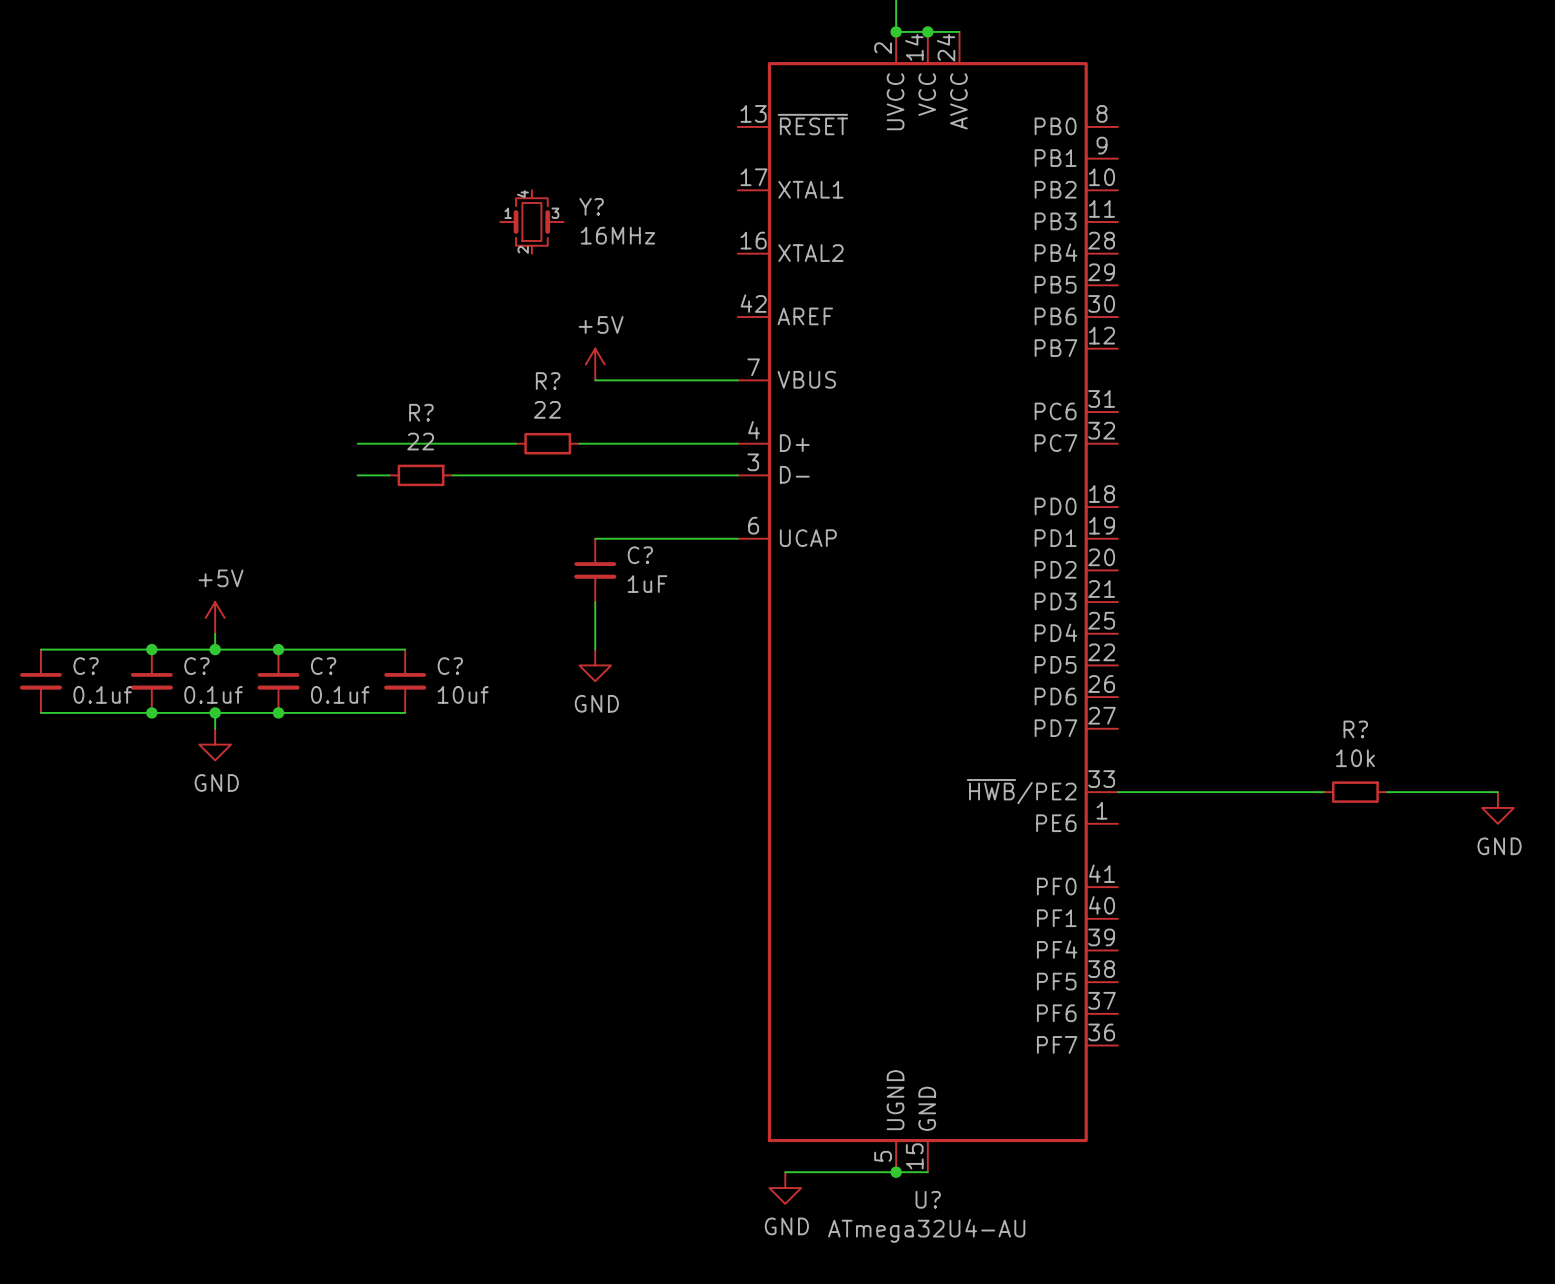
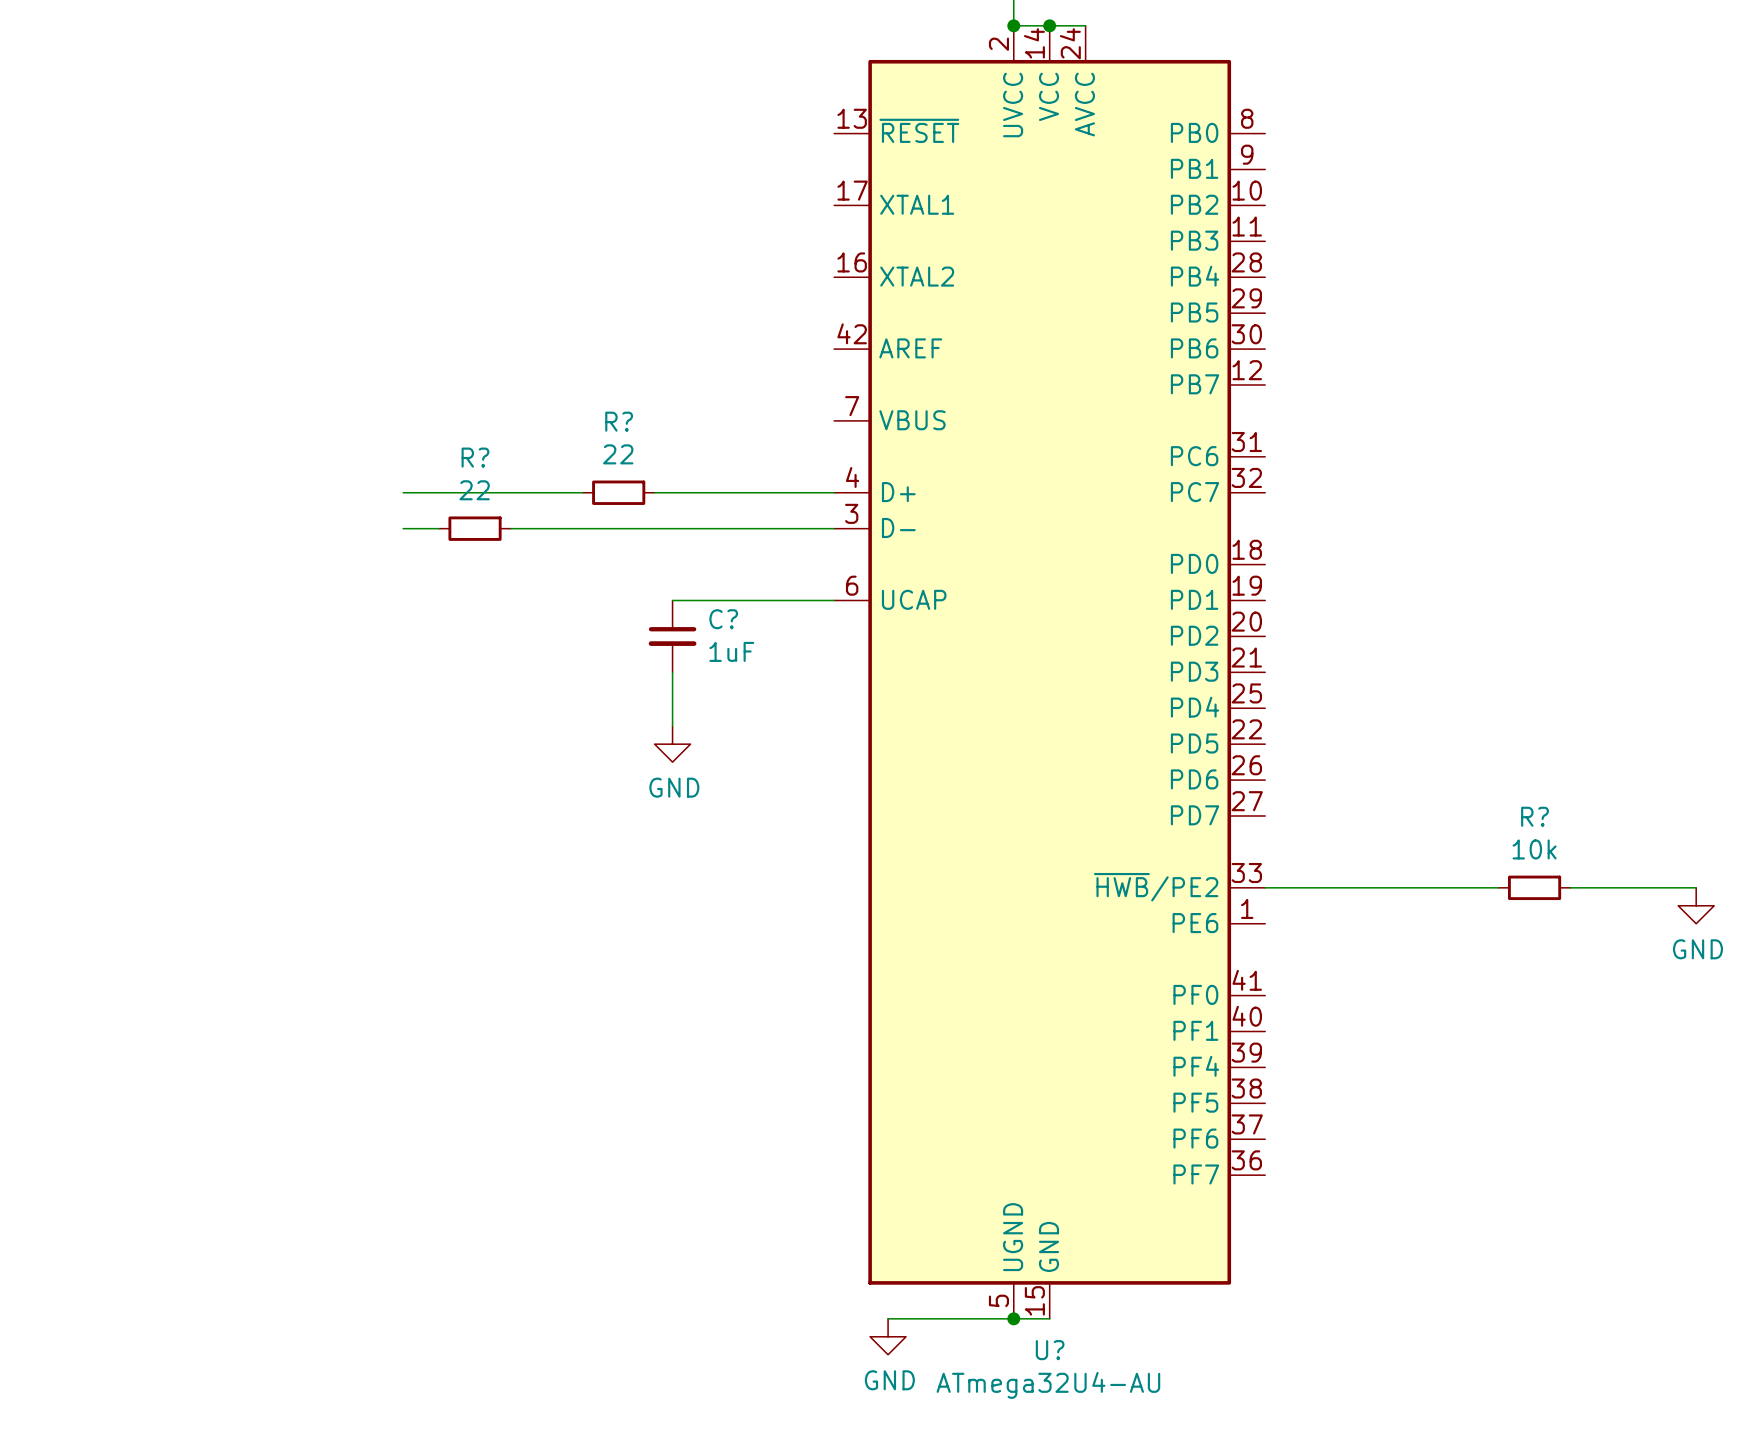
Y?: 16MHz (531, 221) -> none
power symbol: +5V (595, 364) -> none
wire: (595, 380) (737, 380) -> none
power symbol: +5V (215, 617) -> none
wire: (215, 633) (215, 649) -> none
wire: (40, 649) (405, 649) -> none
junction: (151, 649) -> none
junction: (215, 649) -> none
junction: (278, 649) -> none
C?: 0.1uf (40, 681) -> none
C?: 0.1uf (151, 681) -> none
C?: 0.1uf (278, 681) -> none
C?: 10uf (405, 681) -> none
wire: (40, 712) (405, 712) -> none
junction: (151, 712) -> none
wire: (215, 712) (215, 728) -> none
junction: (215, 712) -> none
junction: (278, 712) -> none
power symbol: GND (215, 744) -> none

